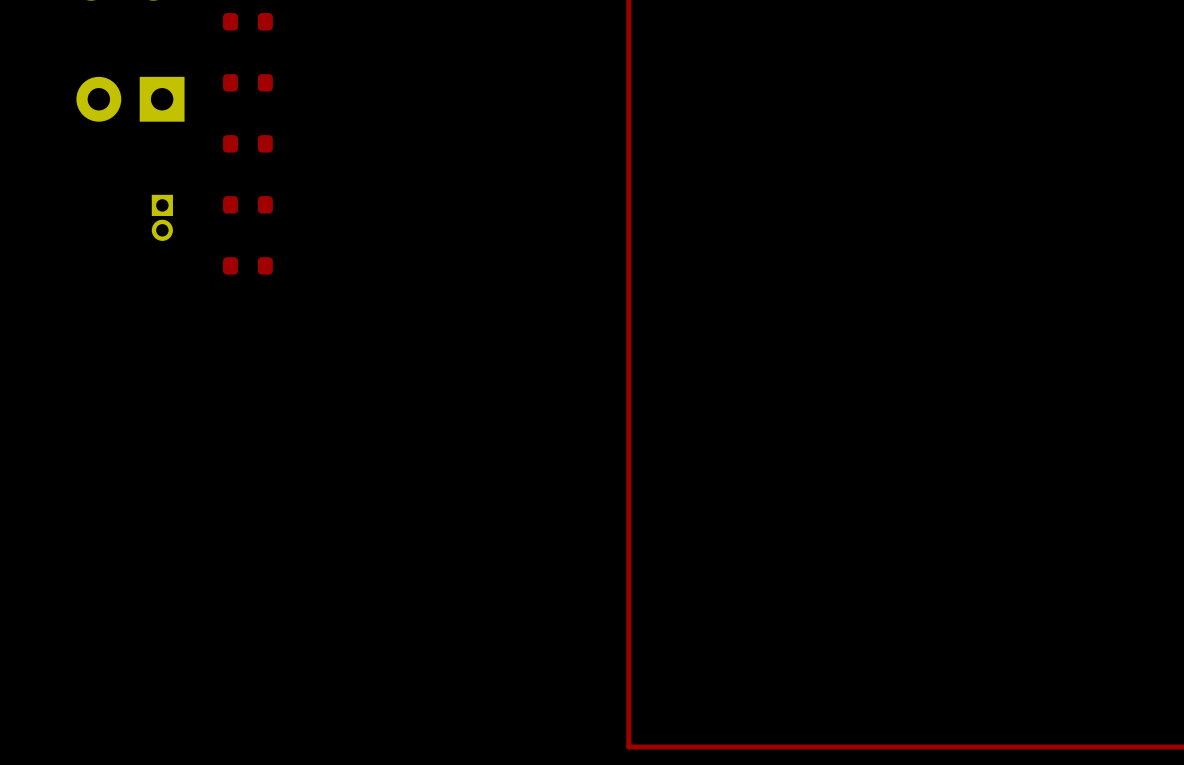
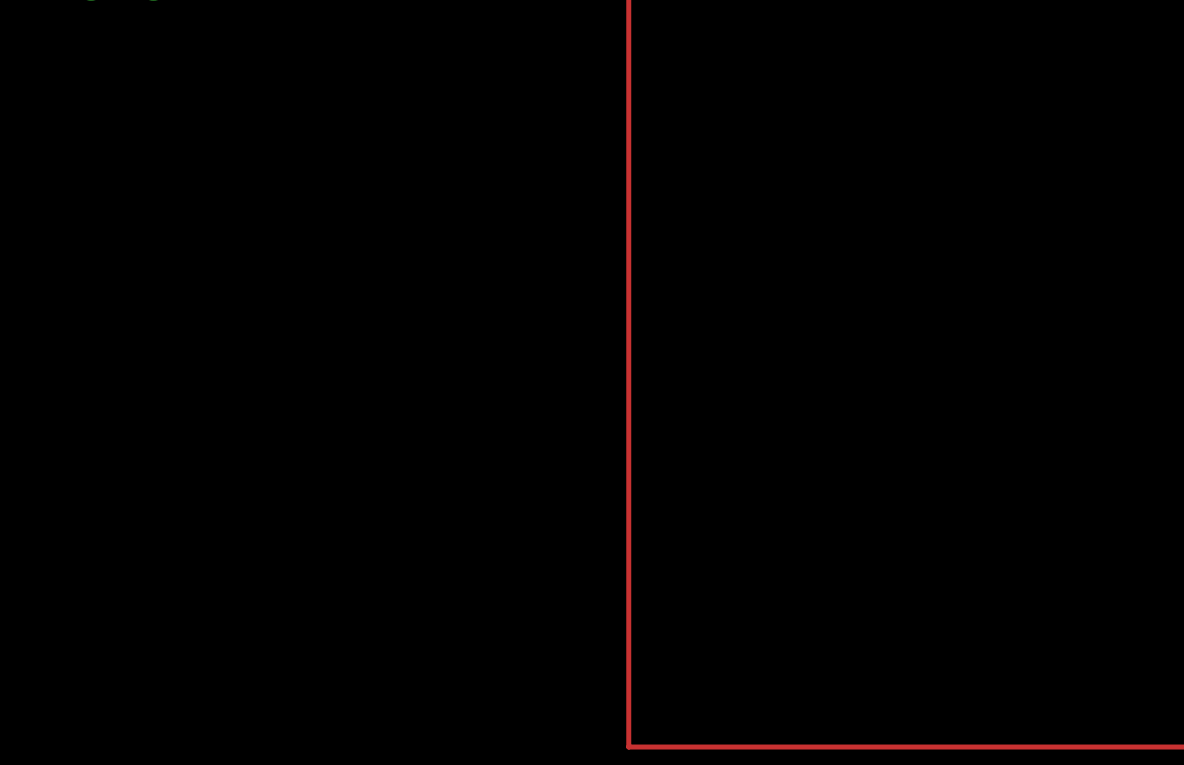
part: (247, 21) -> none
part: (247, 82) -> none
part: (130, 99) -> none
part: (247, 143) -> none
part: (247, 204) -> none
part: (162, 217) -> none
part: (247, 265) -> none

